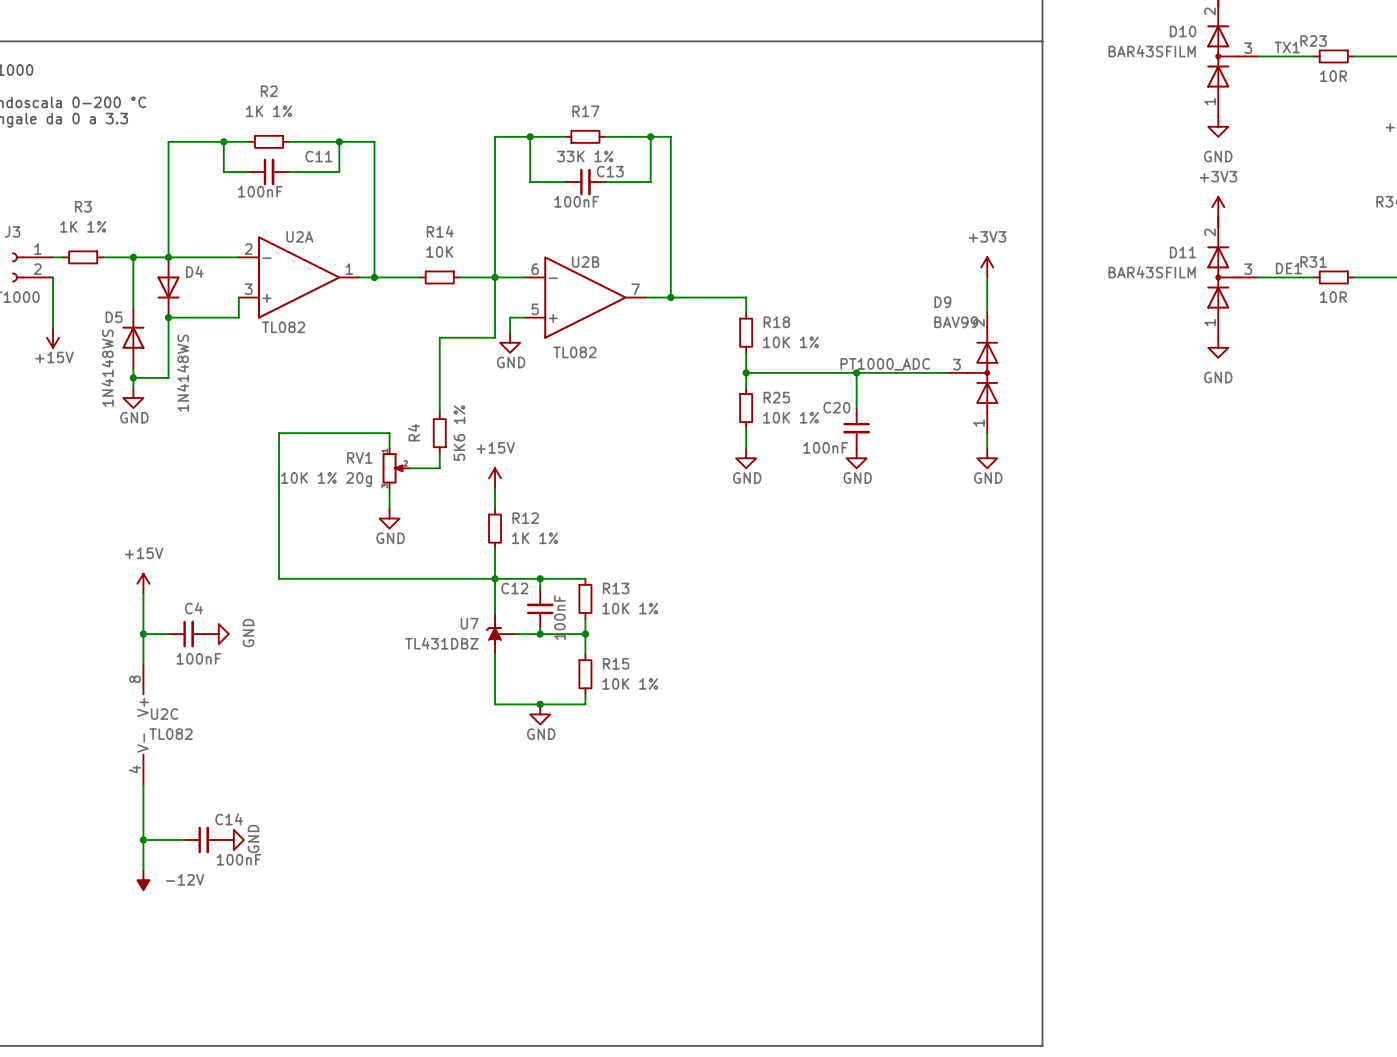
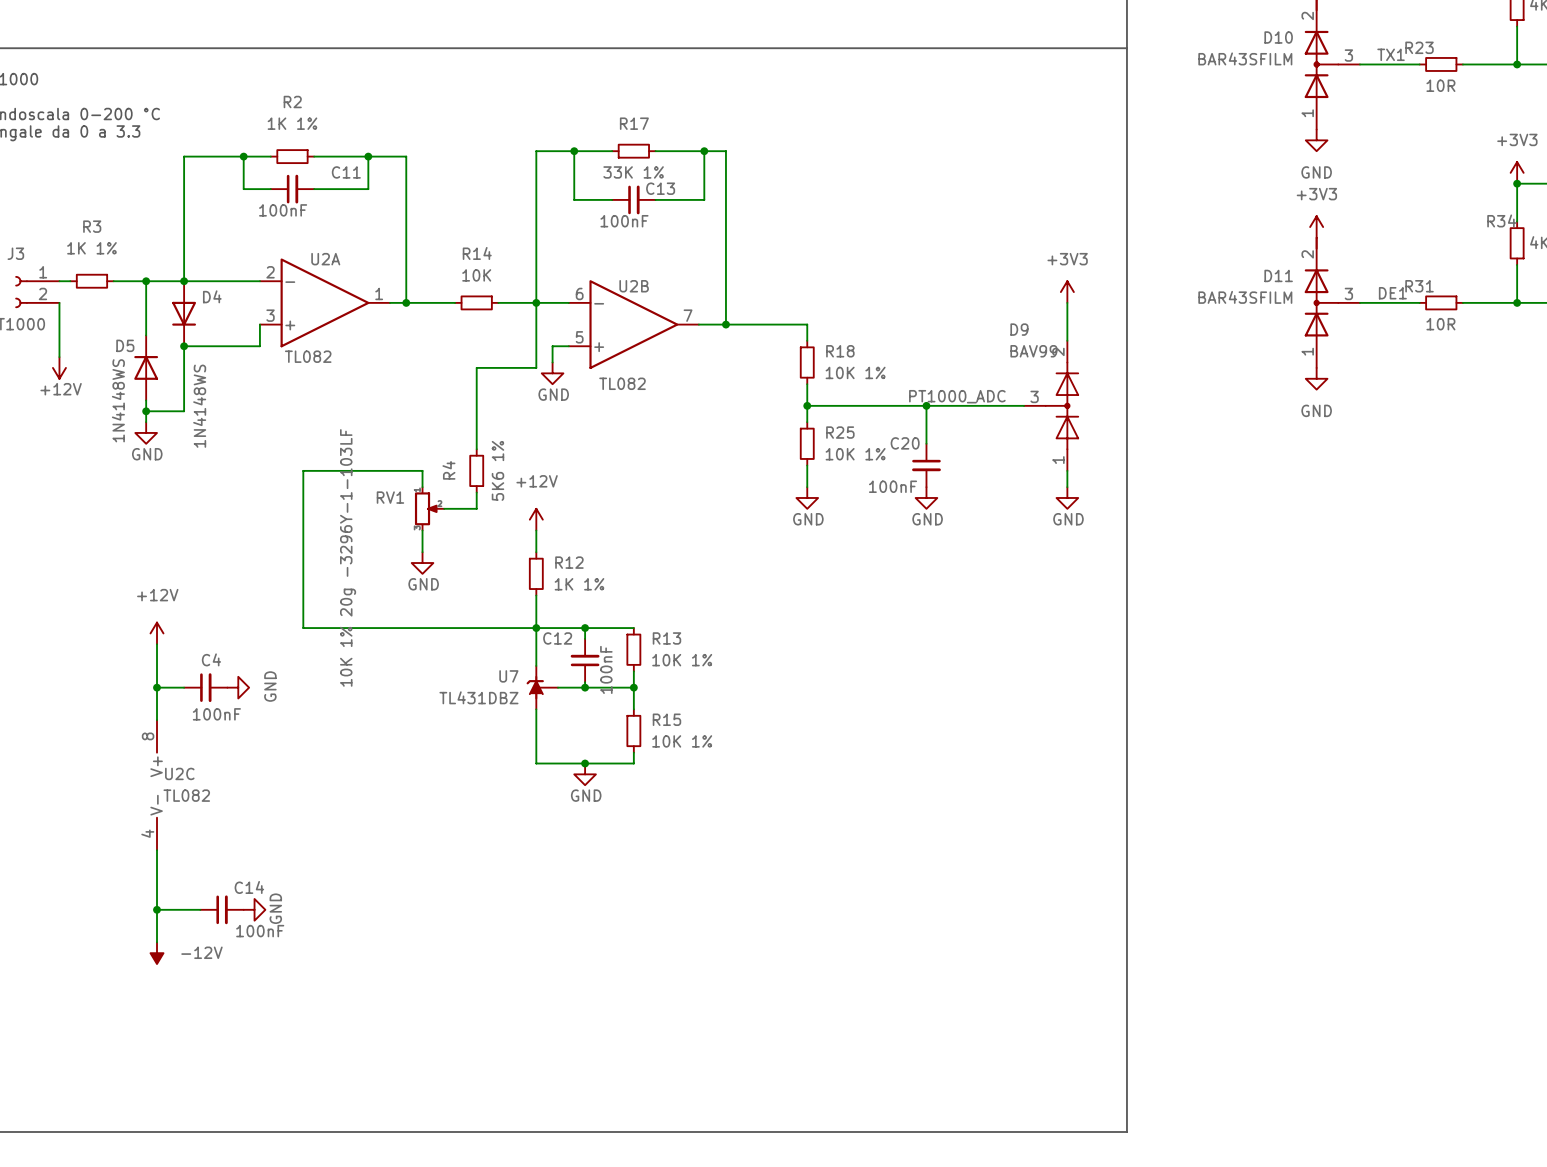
power symbol: +15V (53, 337) -> +12V (59, 367)
power symbol: +15V (495, 478) -> +12V (536, 519)
RV1 value: 10K 1% 20g (326, 479) -> 10K 1% 20g -3296Y-1-103LF (348, 557)
power symbol: +15V (143, 583) -> +12V (157, 633)

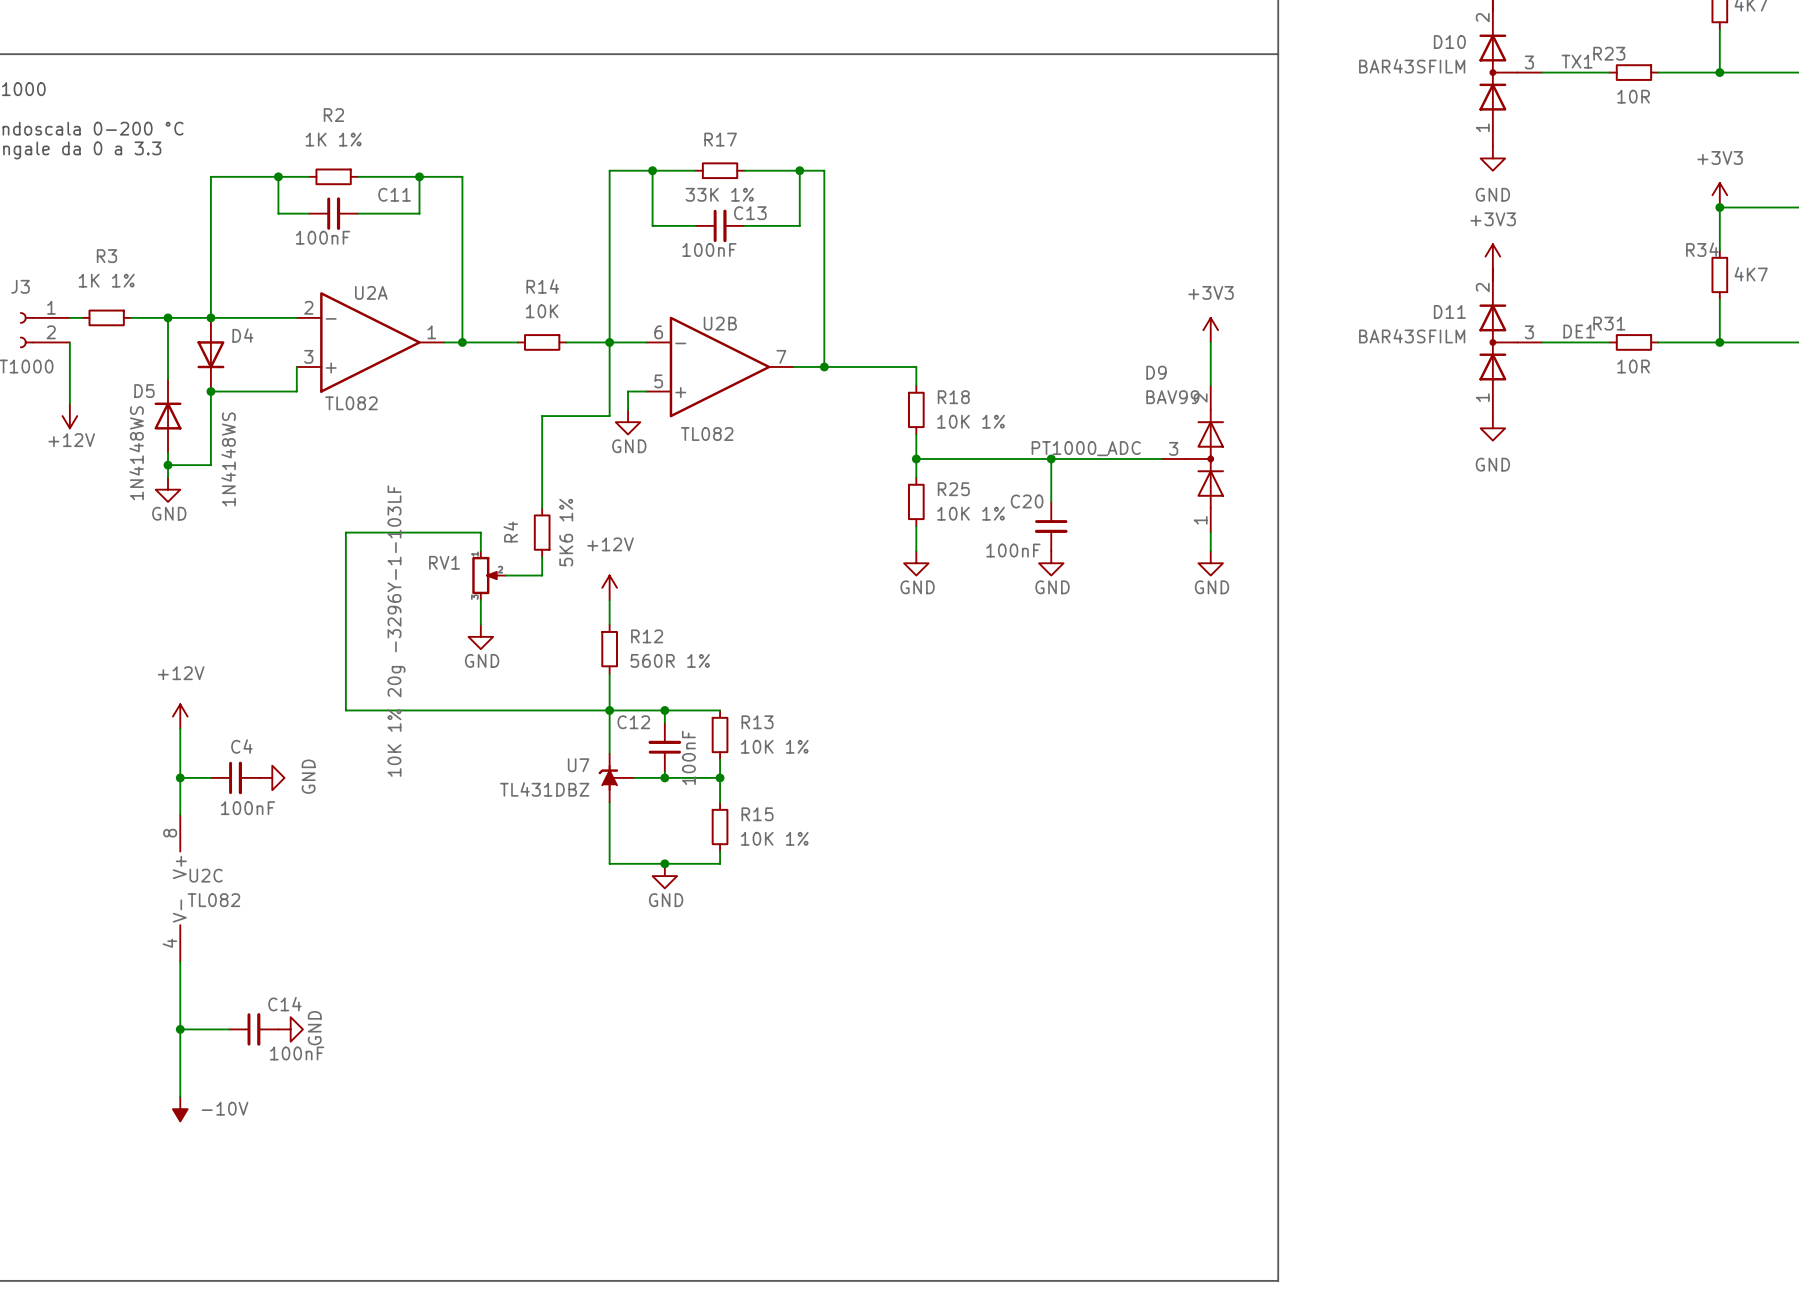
R12 value: 1K 1% (579, 584) -> 560R 1% (670, 660)
power symbol: -12V (157, 953) -> none
power symbol: none -> -10V (180, 1109)

